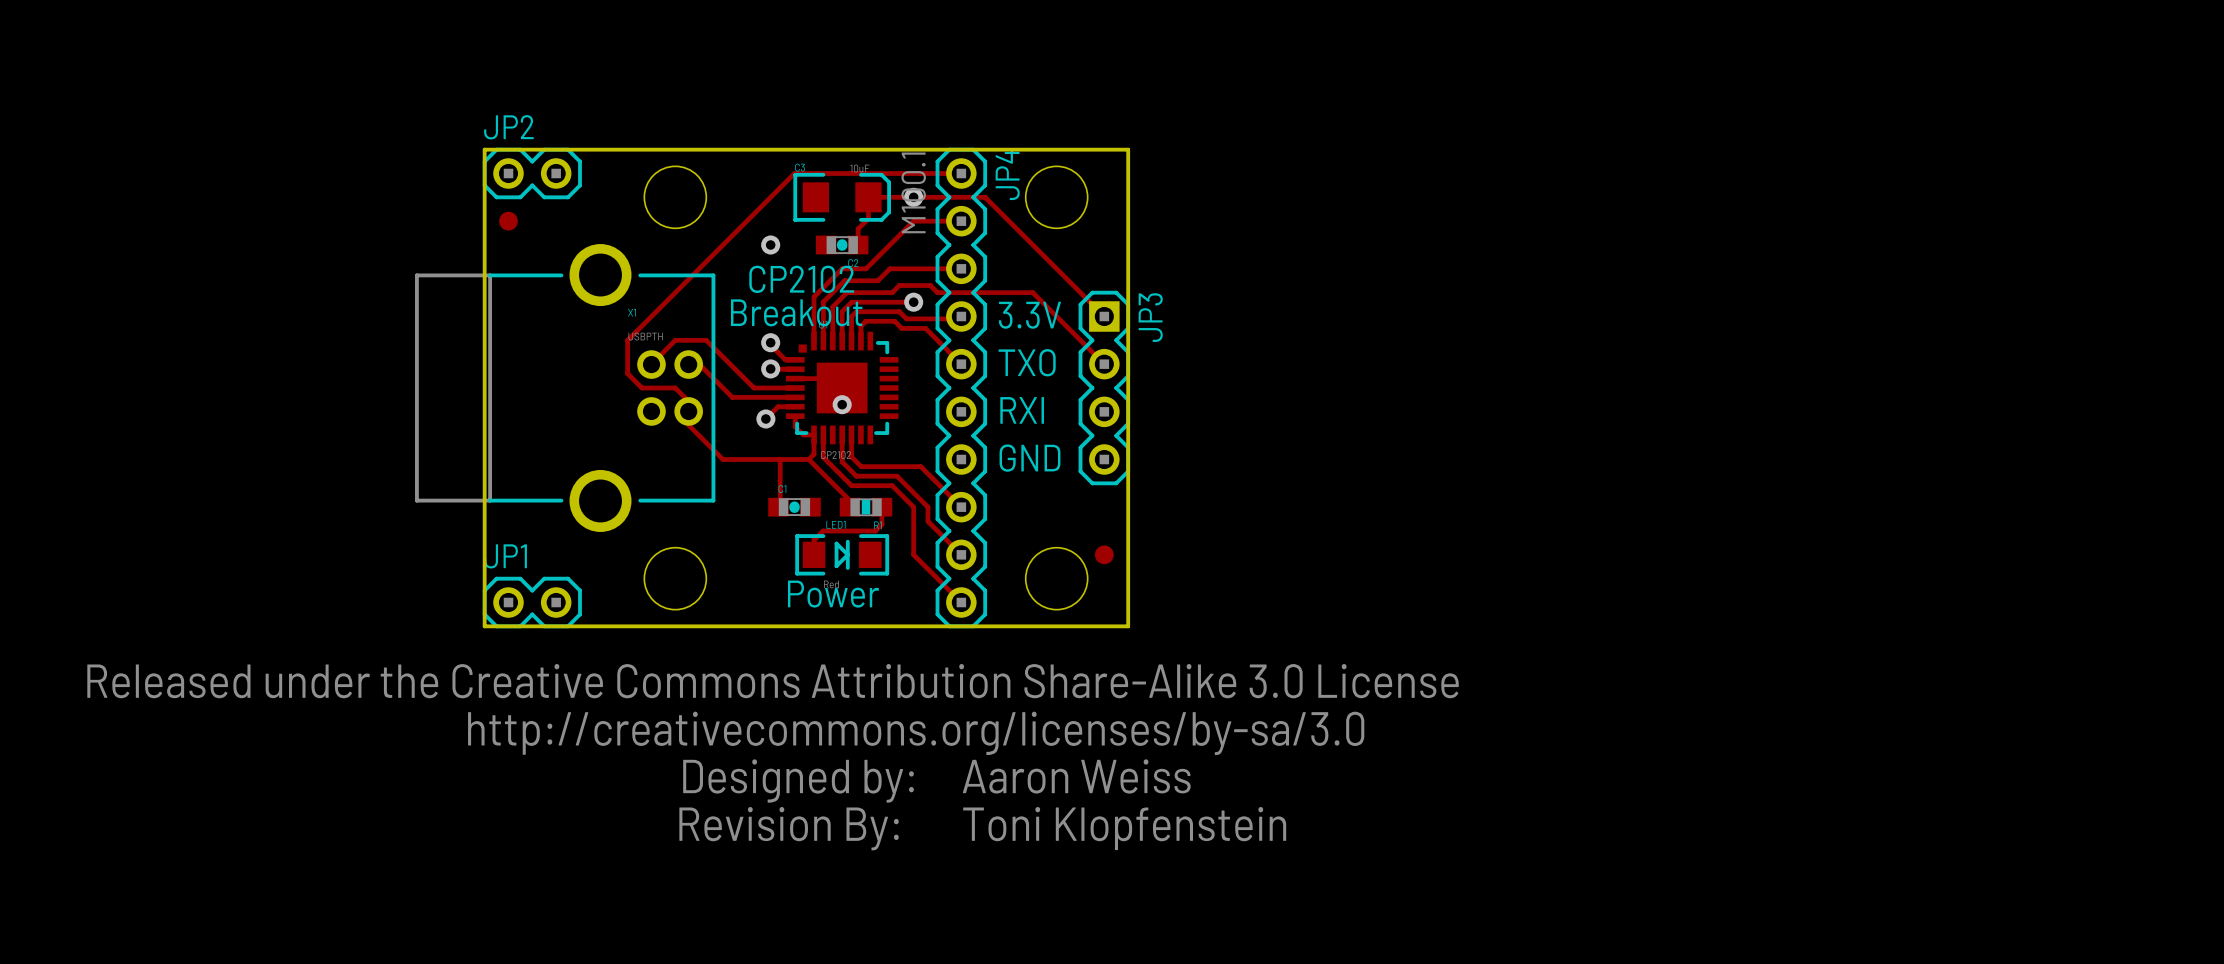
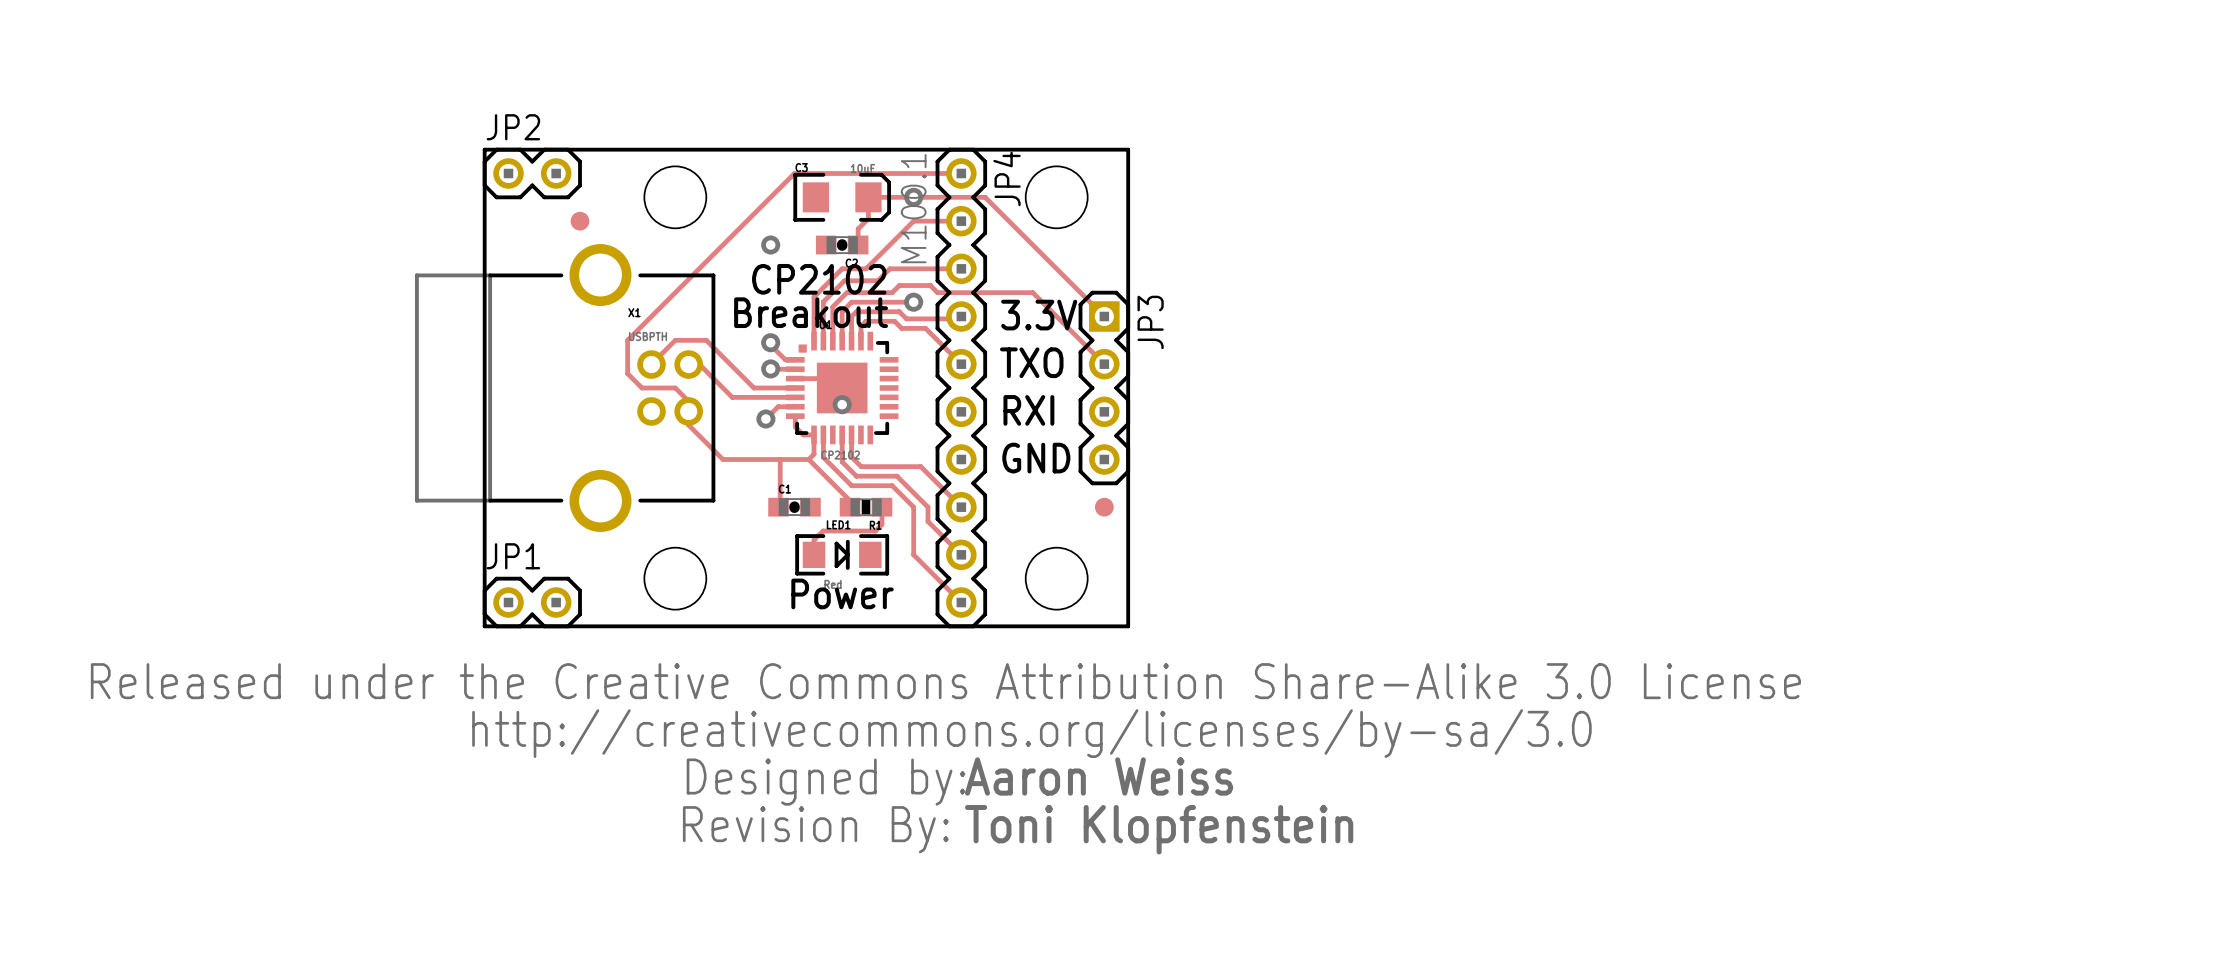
part position: (508, 221) -> (580, 221)
part position: (1104, 554) -> (1104, 507)

